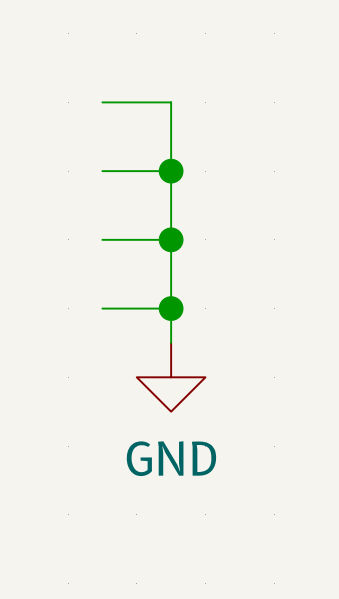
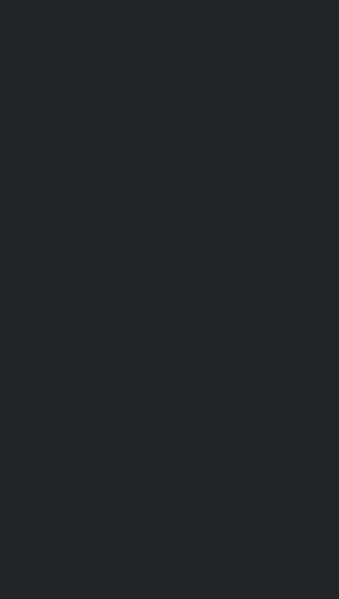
wire: (102, 102) (171, 102) (171, 342) -> none
wire: (102, 171) (171, 171) -> none
junction: (171, 171) -> none
wire: (102, 239) (171, 239) -> none
junction: (171, 239) -> none
wire: (102, 308) (171, 308) -> none
junction: (171, 308) -> none
power symbol: GND (171, 377) -> none

